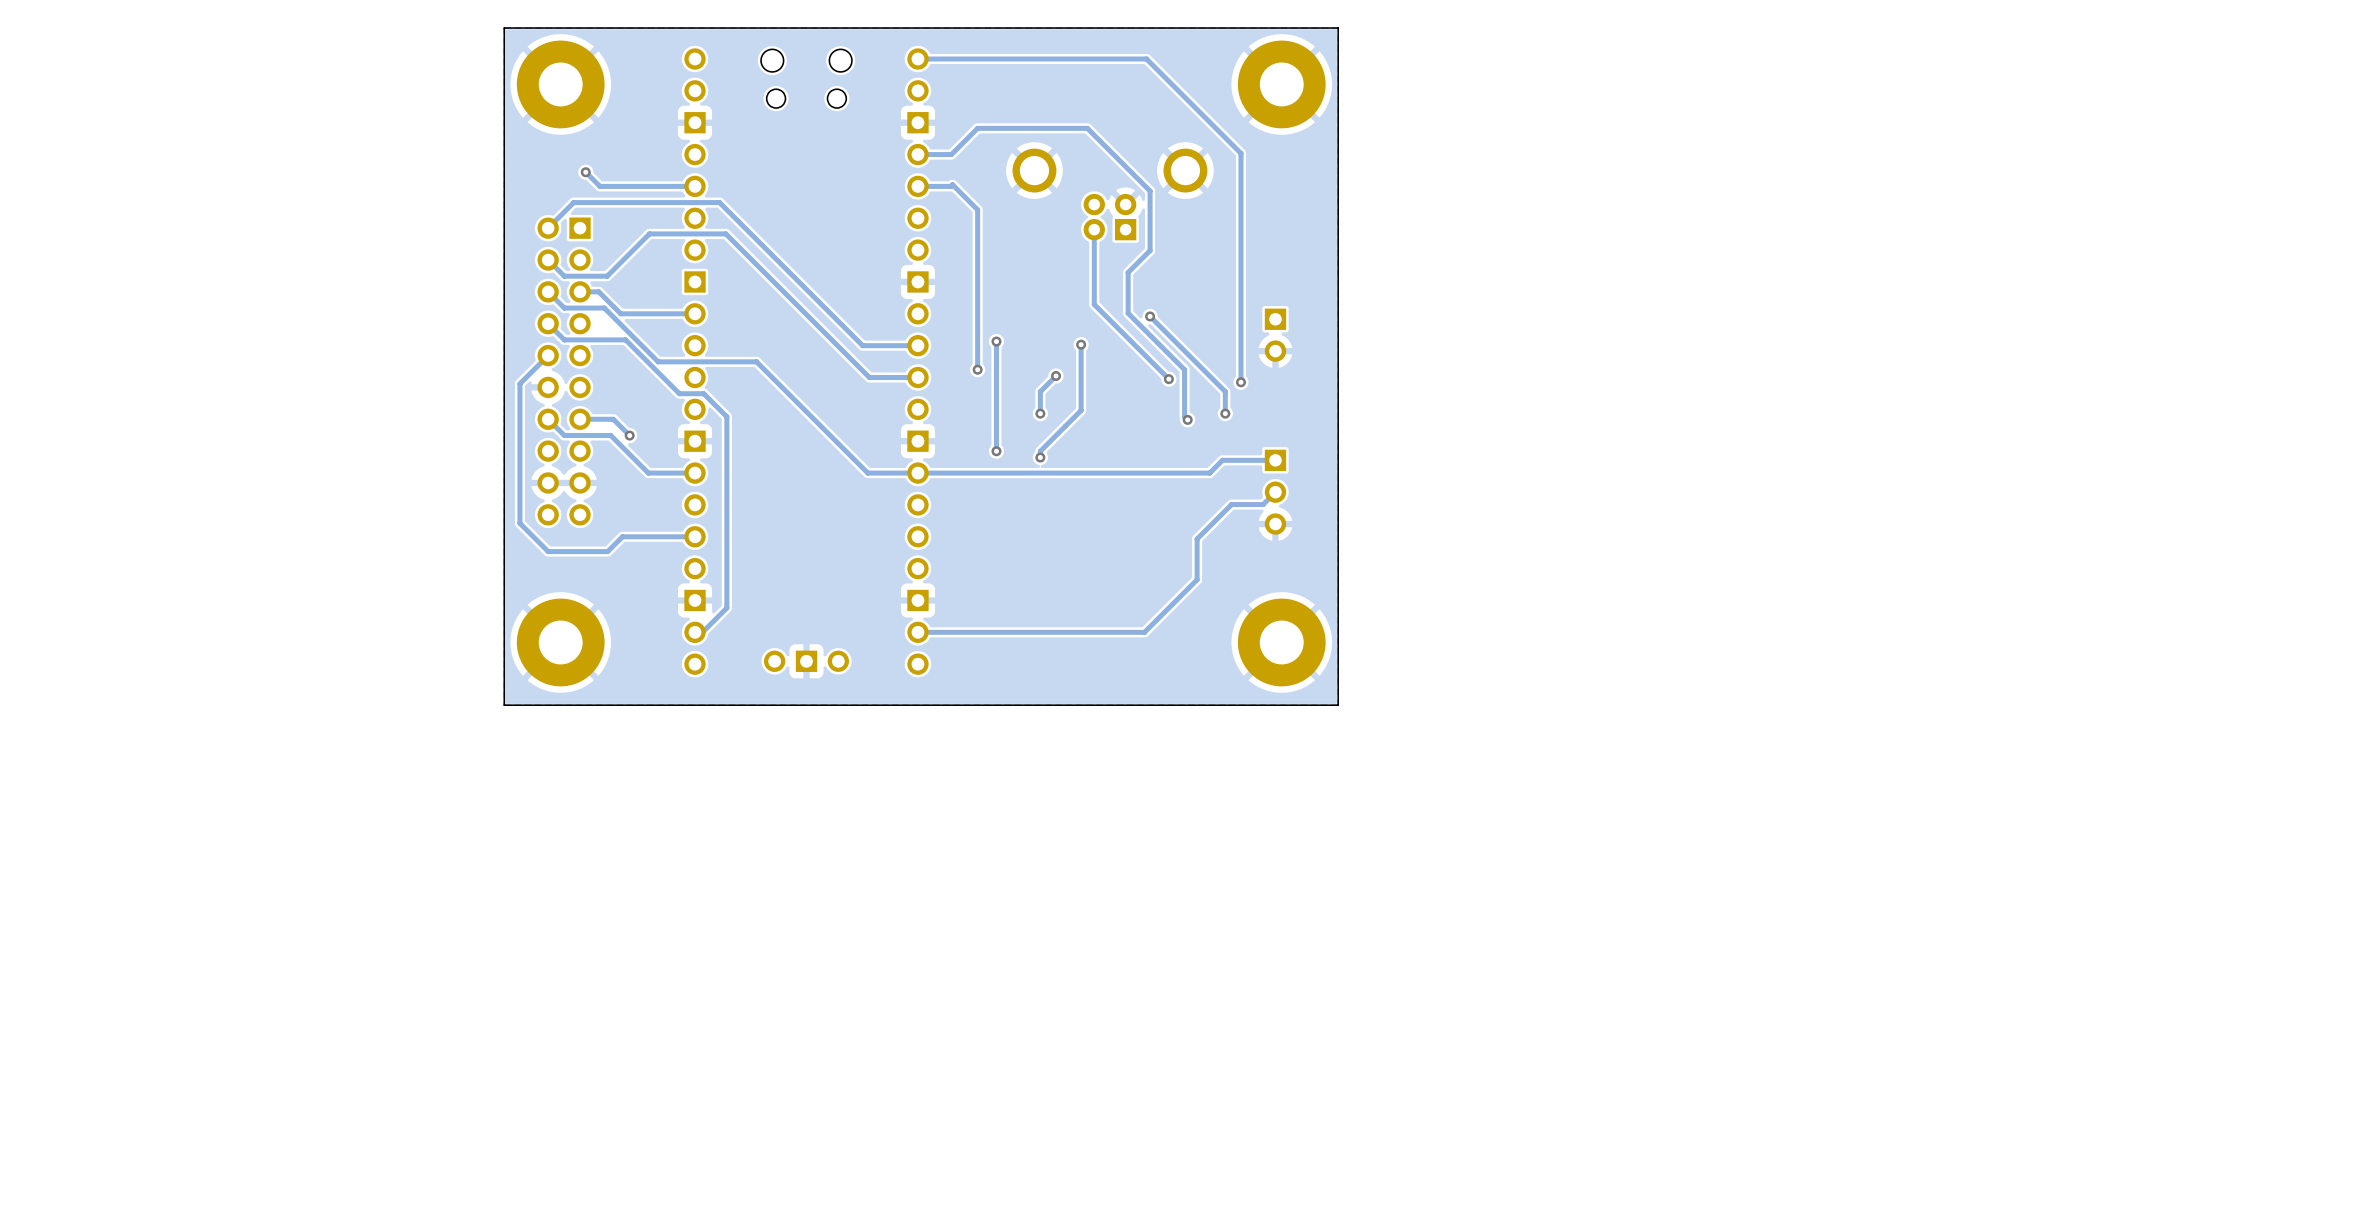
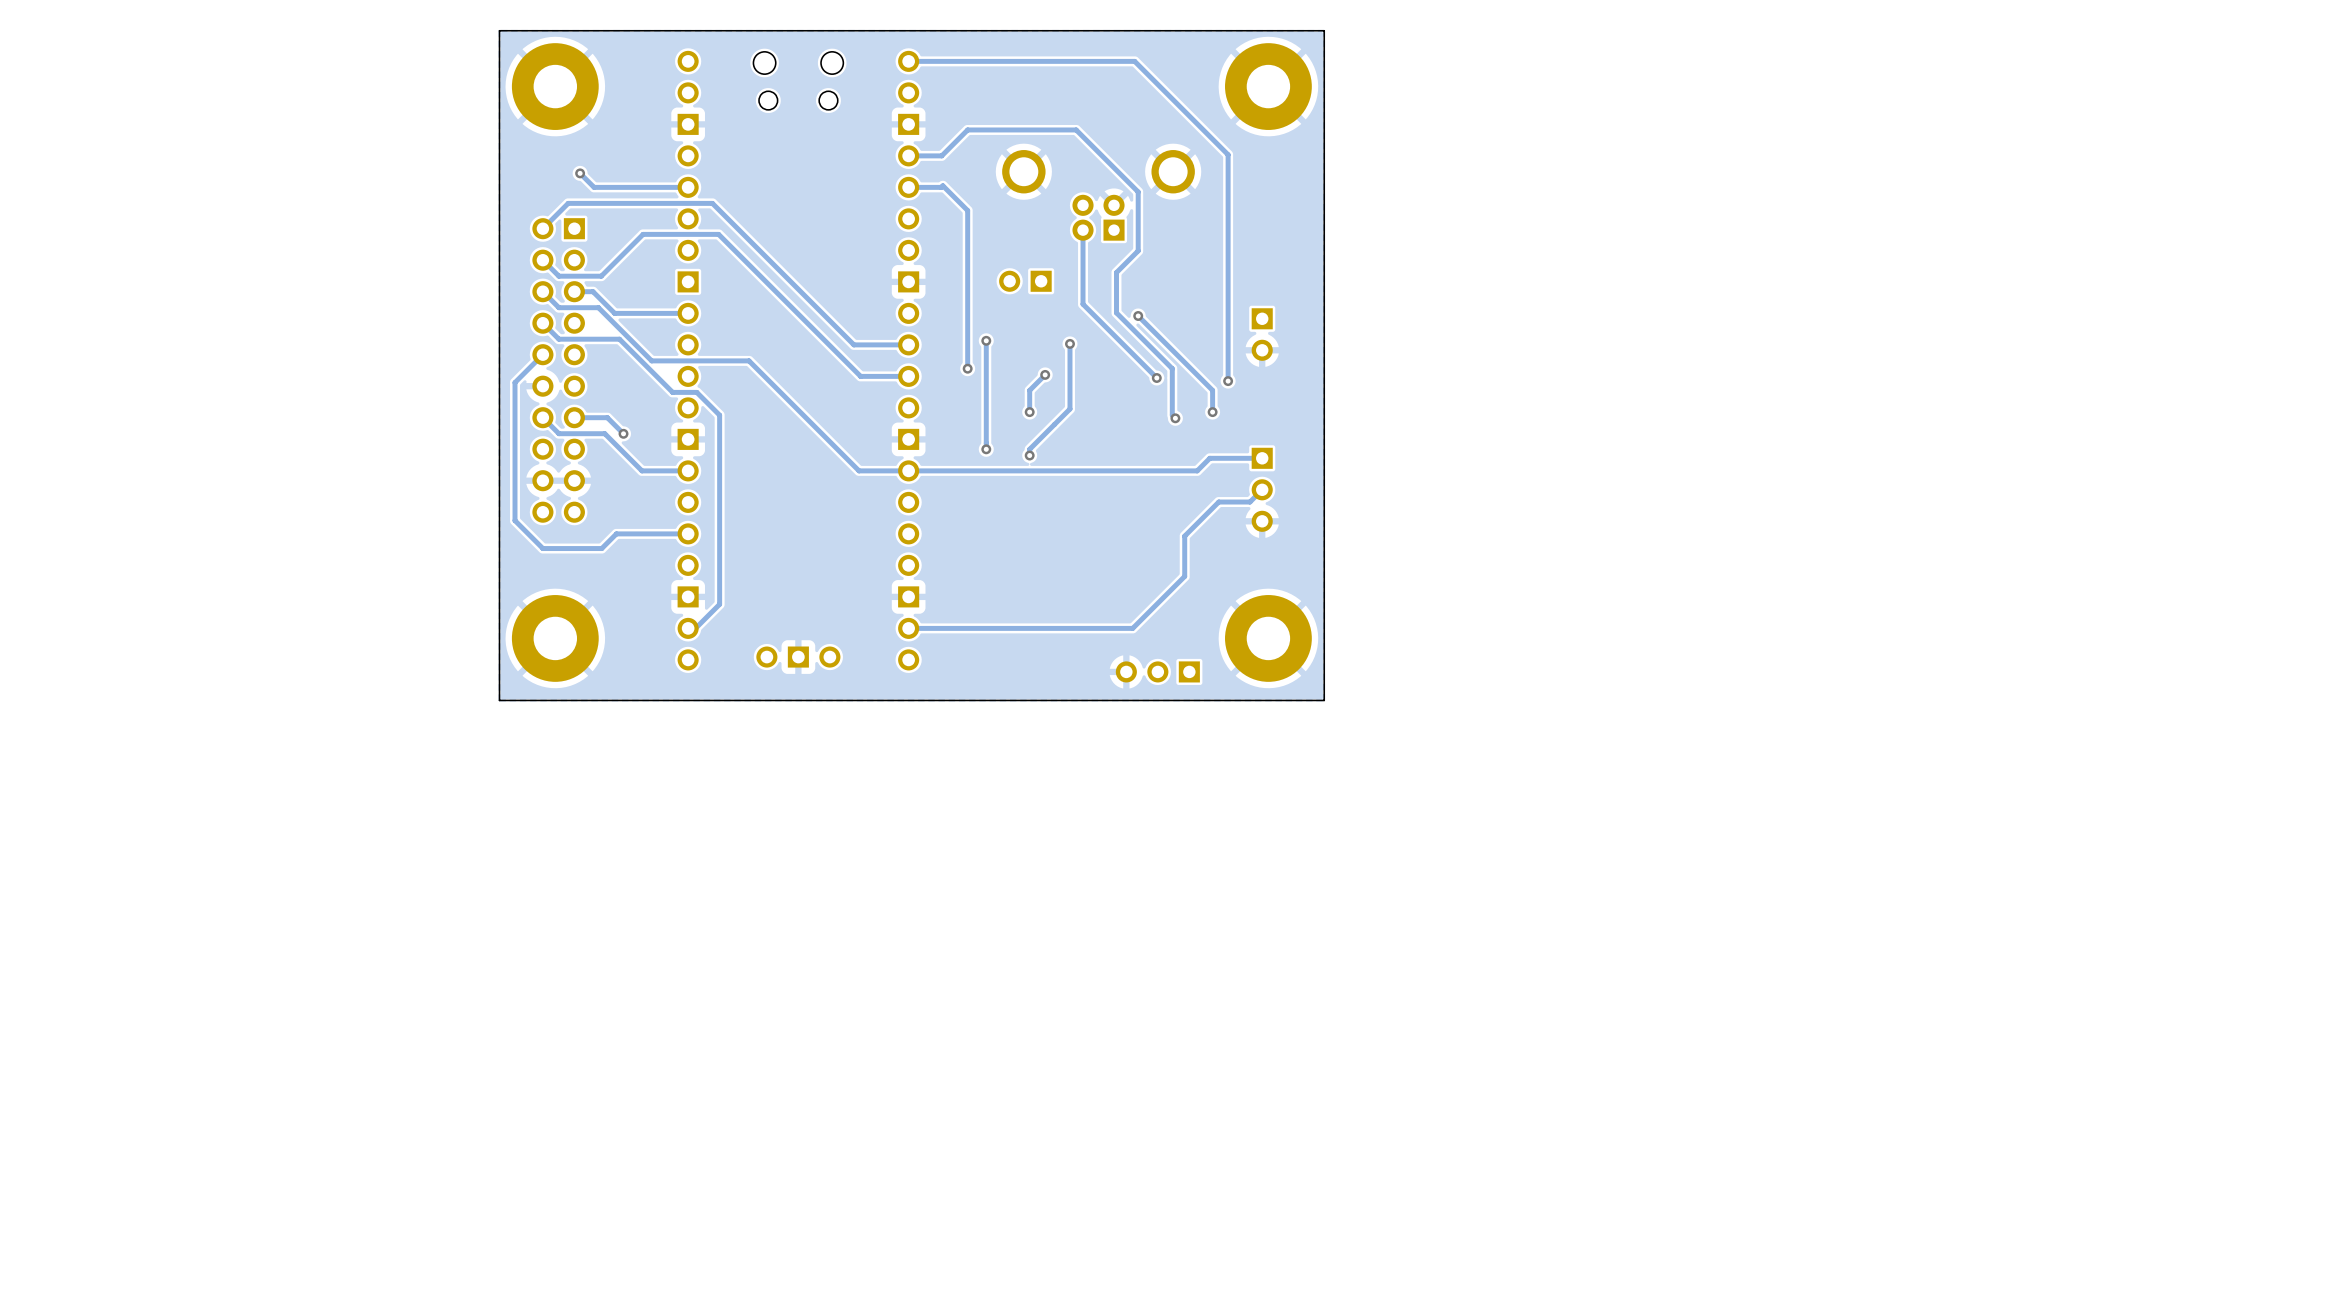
part: none -> (1025, 281)
part: none -> (1157, 671)

